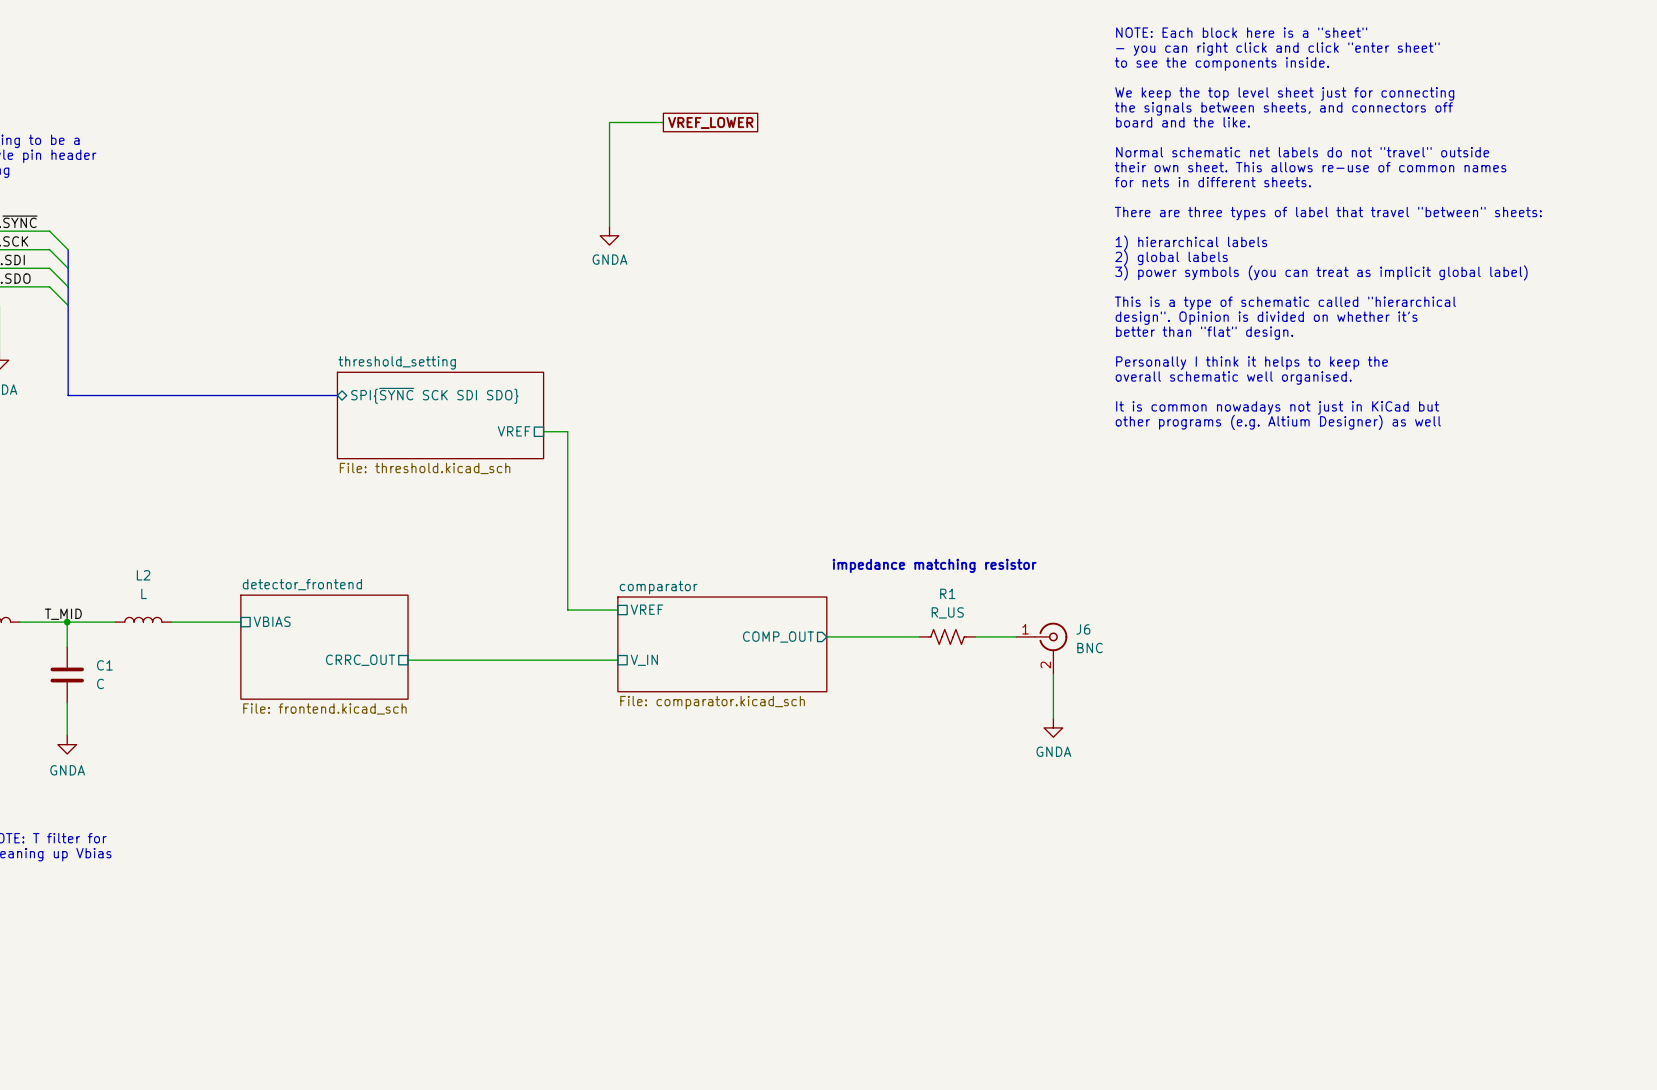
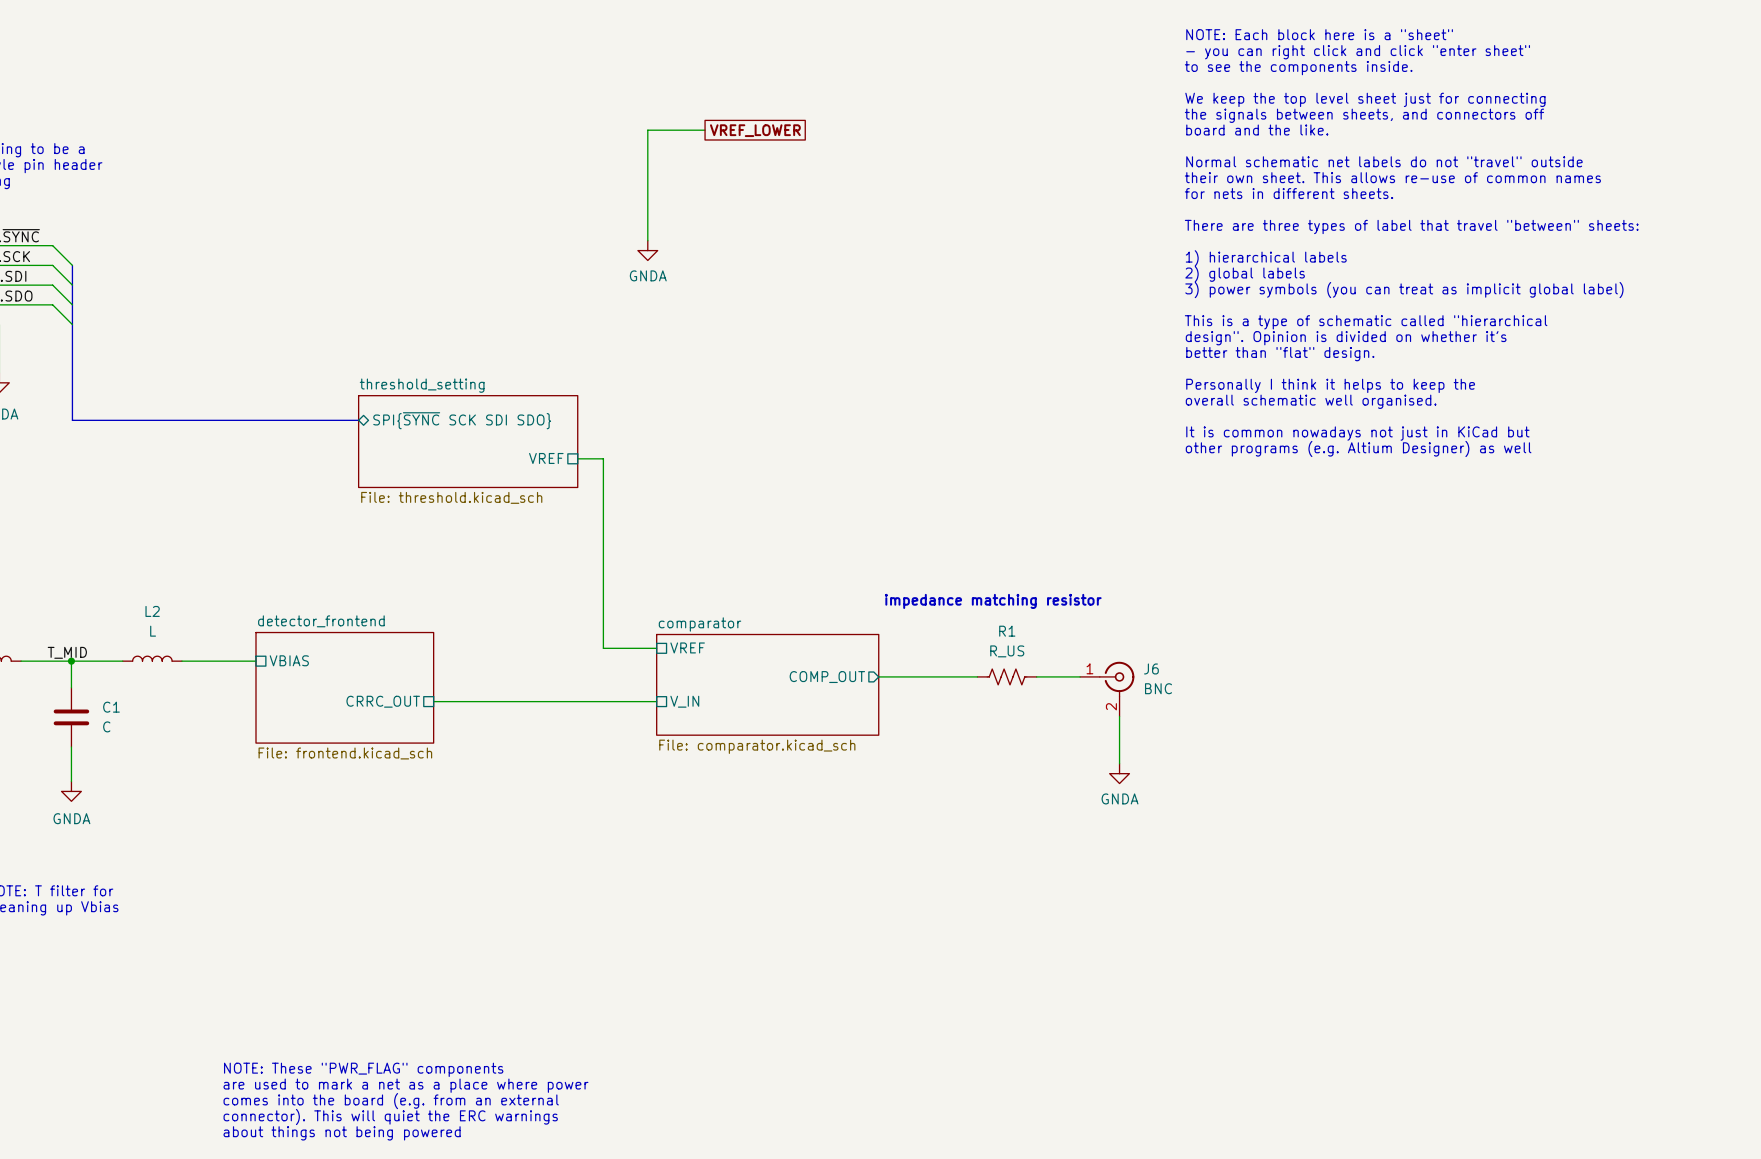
text: none -> NOTE: These "PWR_FLAG" components (363, 1069)
text: none -> are used to mark a net as a place where power (405, 1085)
text: none -> comes into the board (e.g. from an external (391, 1101)
text: none -> connector). This will quiet the ERC warnings (390, 1117)
text: none -> about things not being powered (342, 1133)

